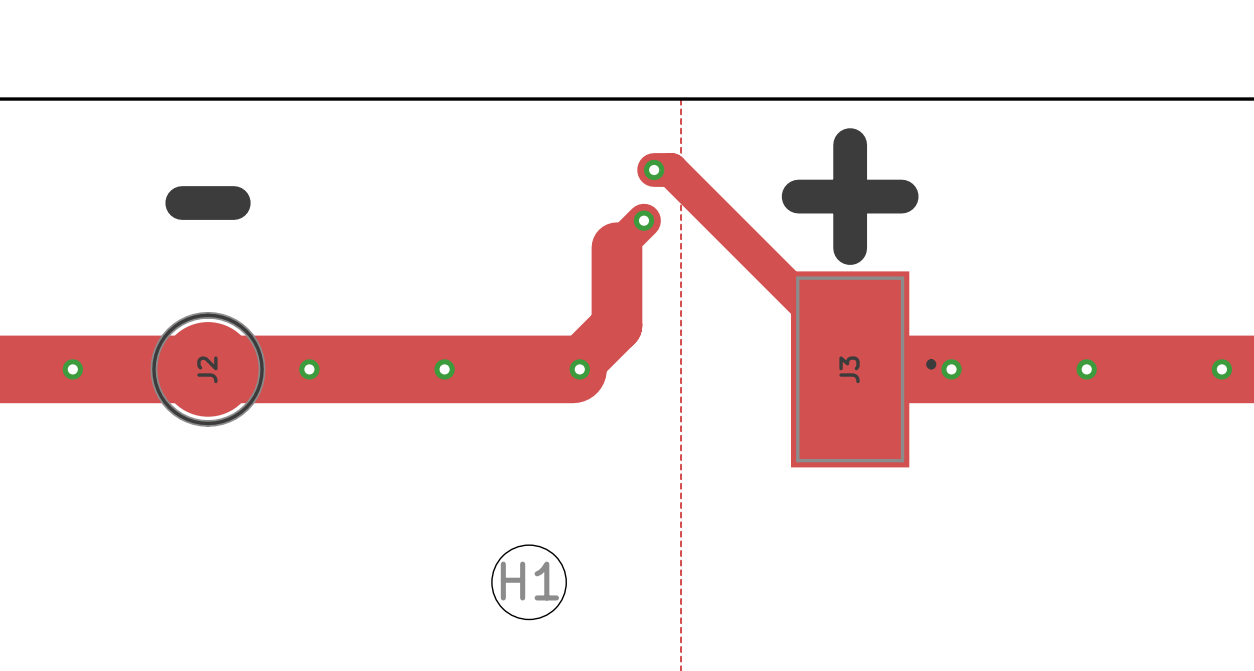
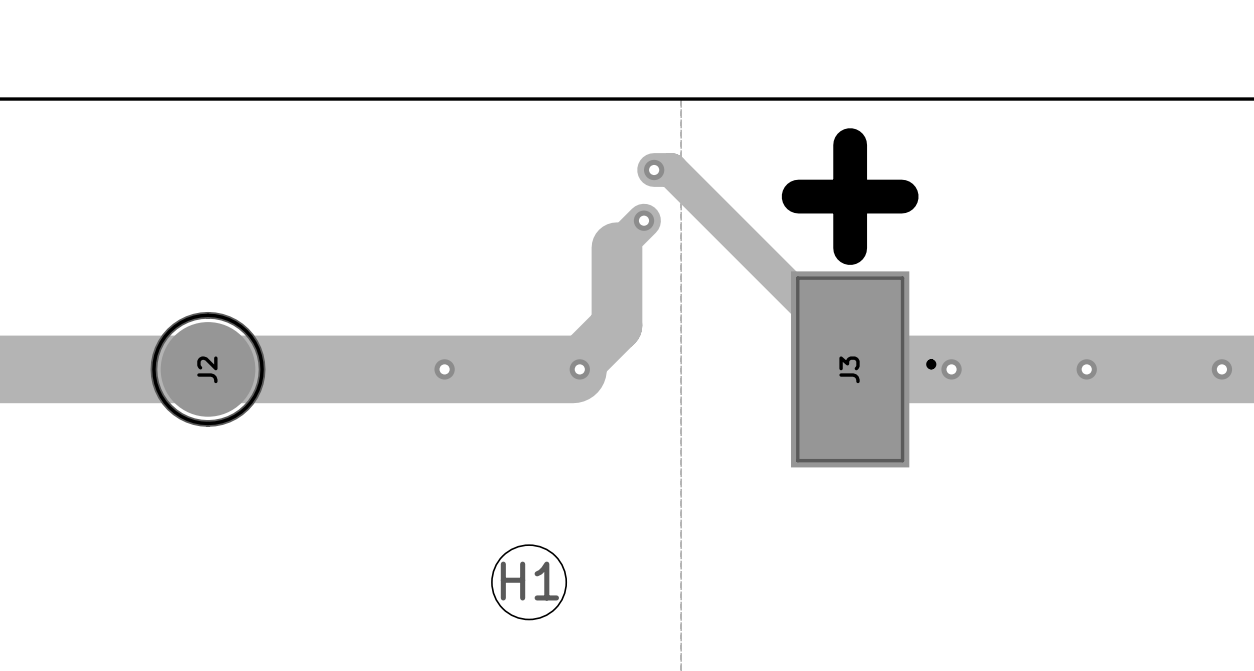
text: – (208, 203) -> none
via: (72, 369) -> none
via: (309, 369) -> none

